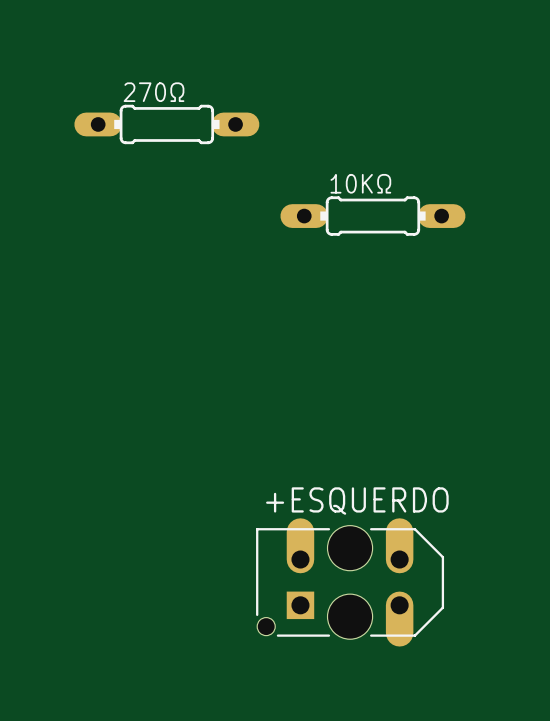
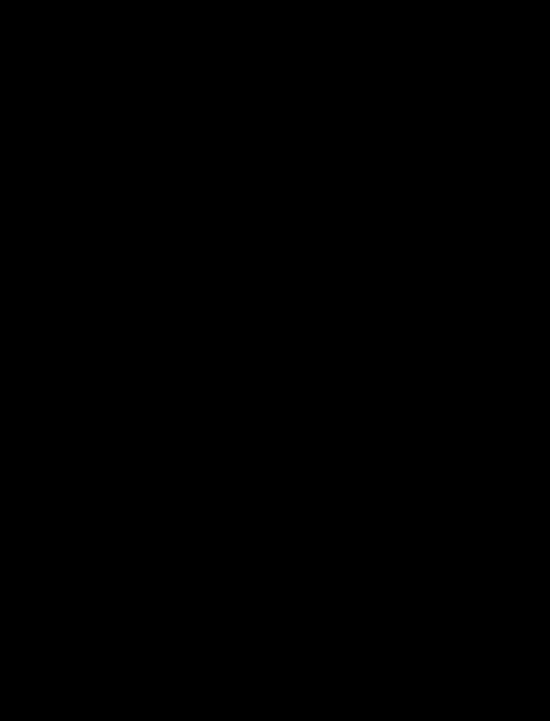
270Ω: (166, 124) -> none
10KΩ: (372, 216) -> none
+ESQUERDO: (350, 582) -> none

